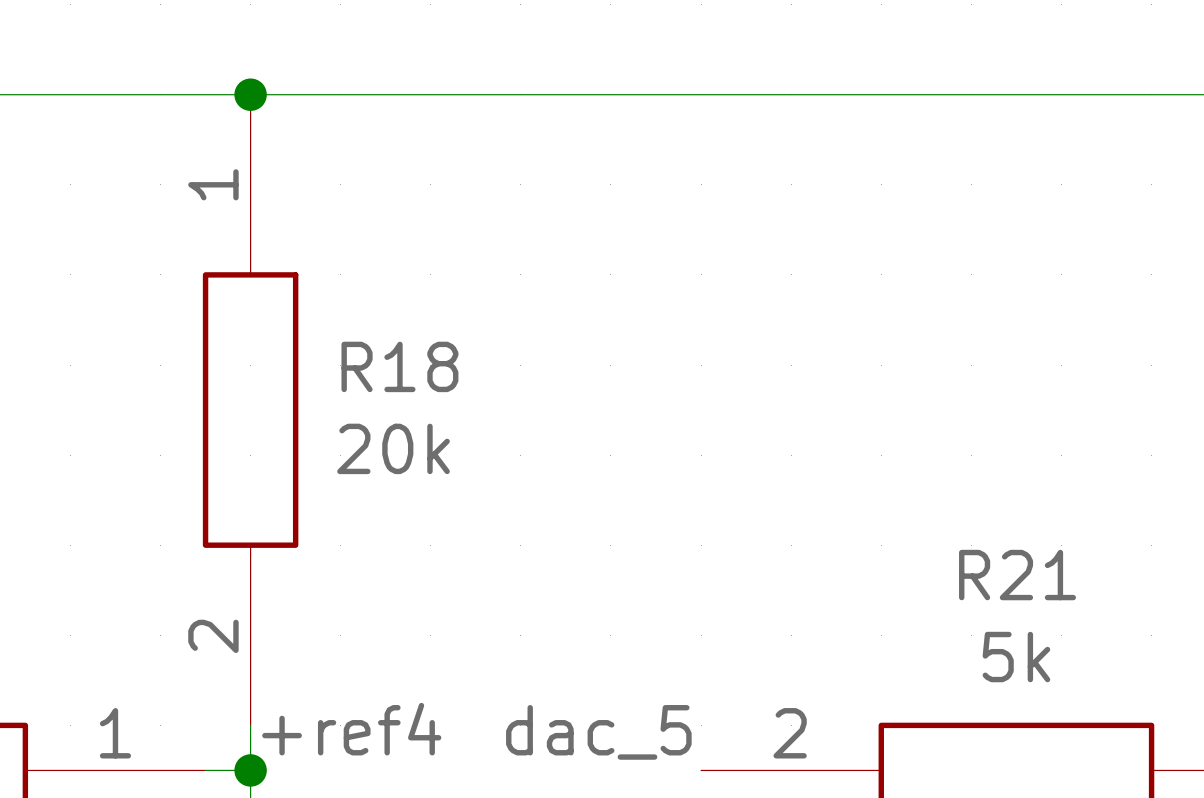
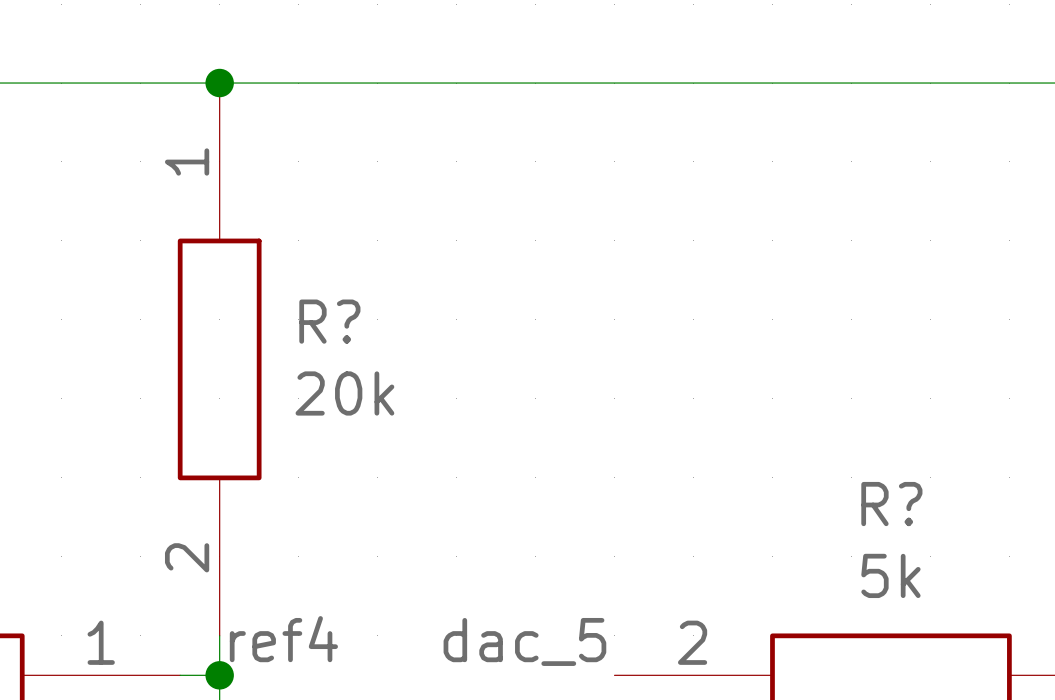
R18 name: R18 (399, 366) -> R? (329, 321)
R21 name: R21 (1017, 575) -> R? (891, 504)
label: +ref4 (351, 729) -> ref4 (283, 639)

